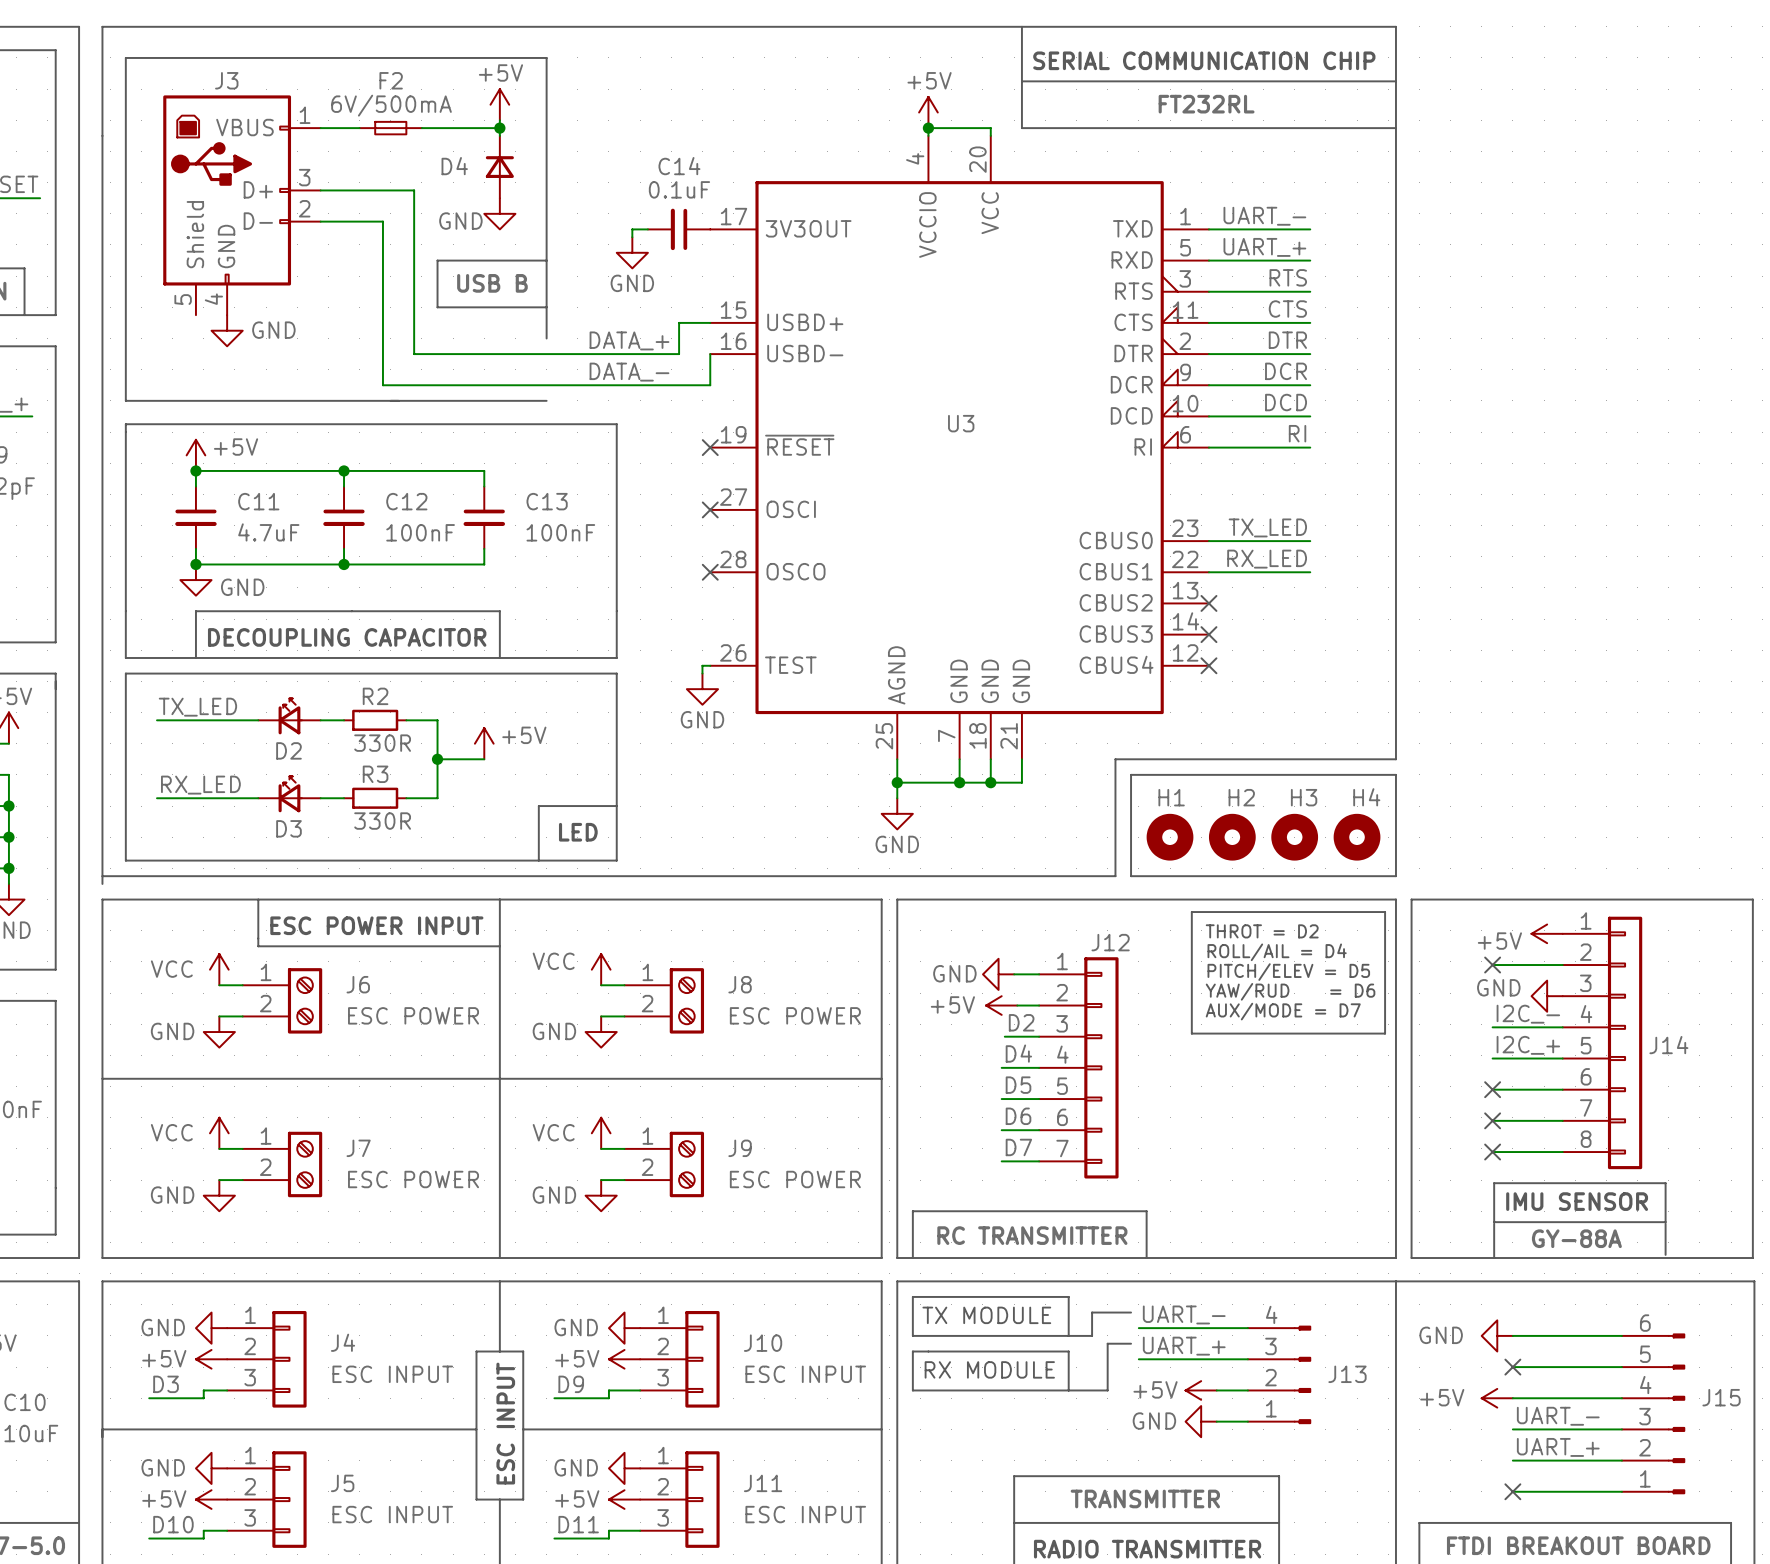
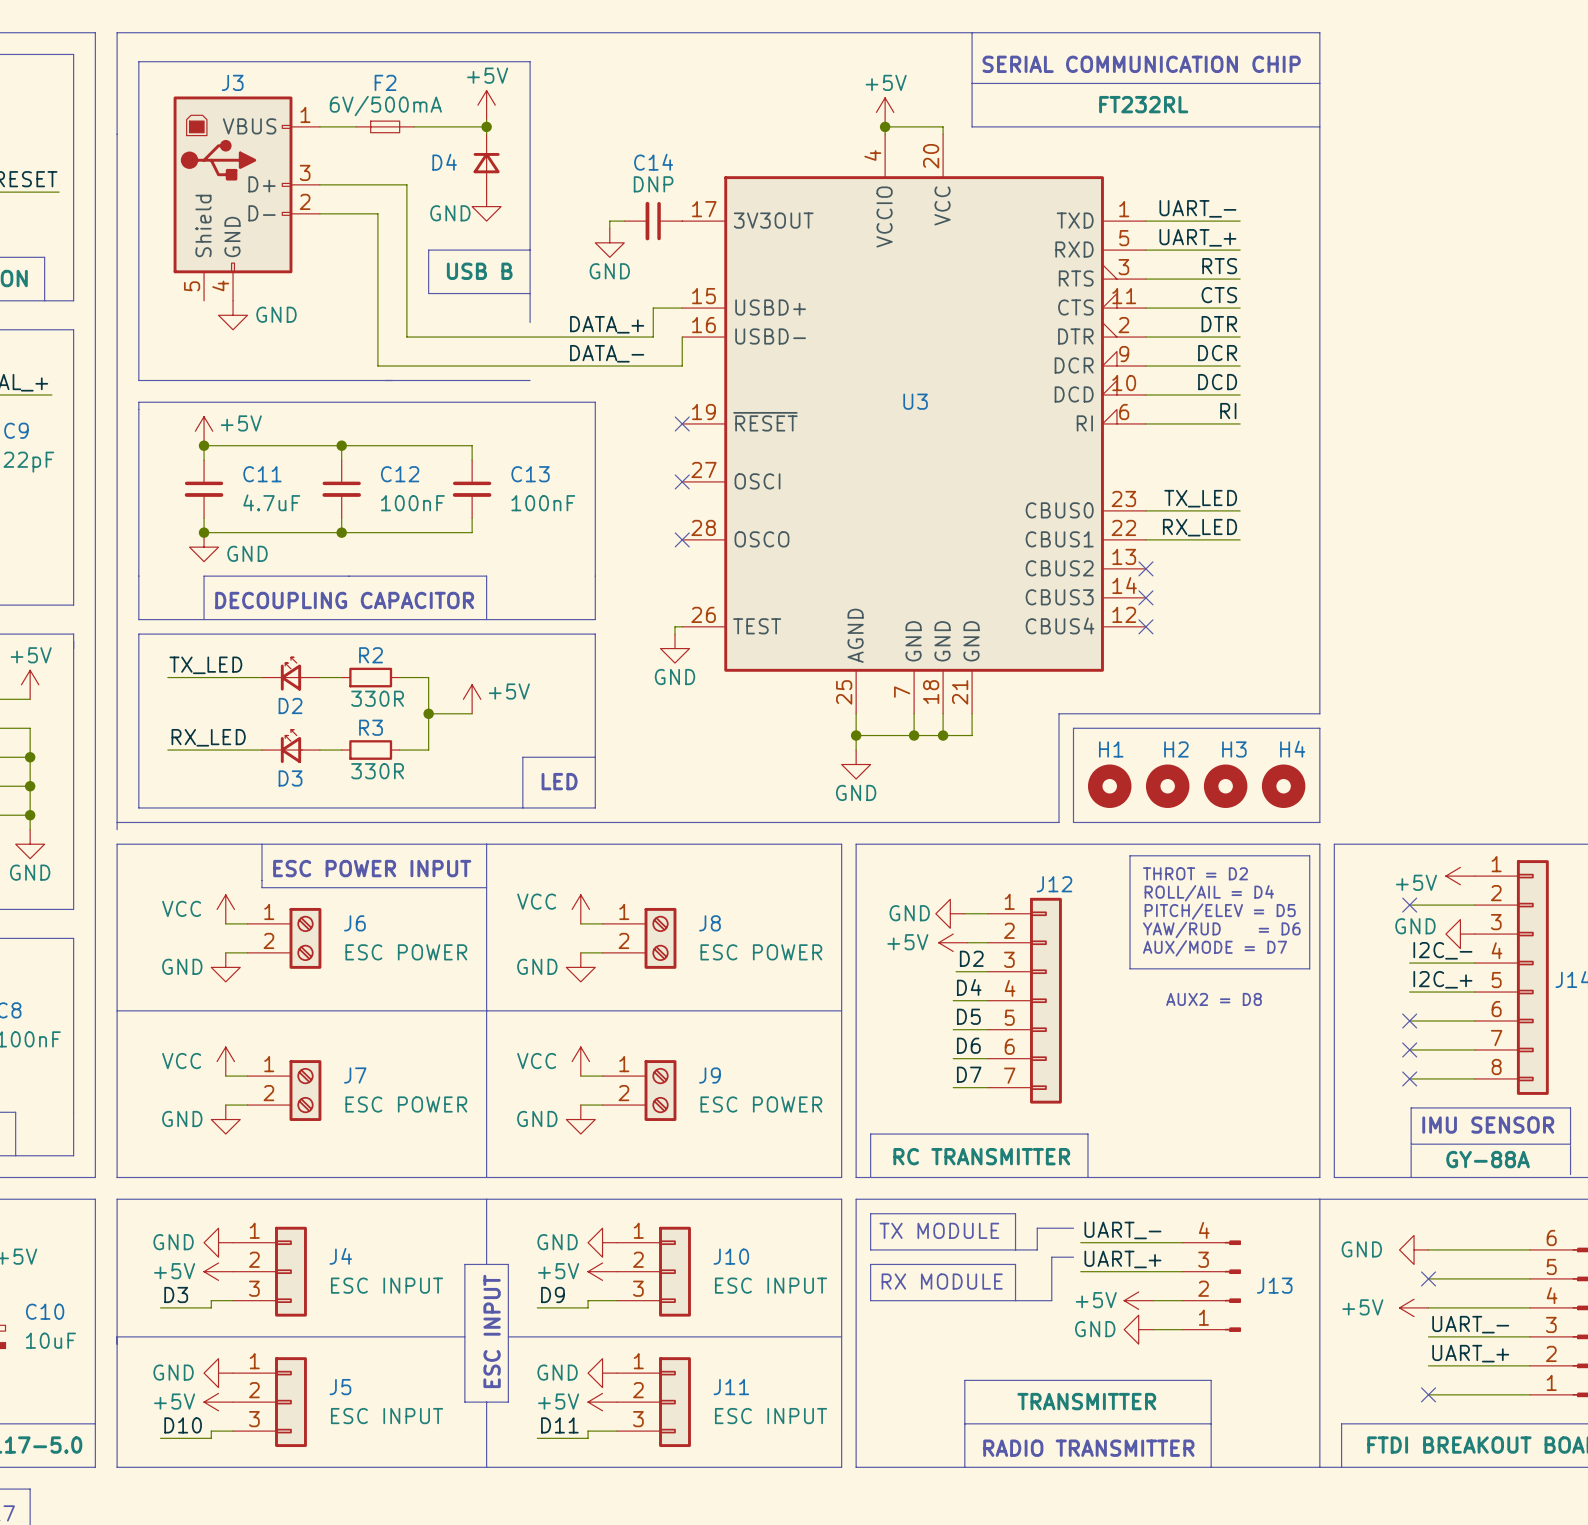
C14 value: 0.1uF (679, 189) -> DNP (653, 184)
text: none -> AUX2 = D8 (1214, 999)

